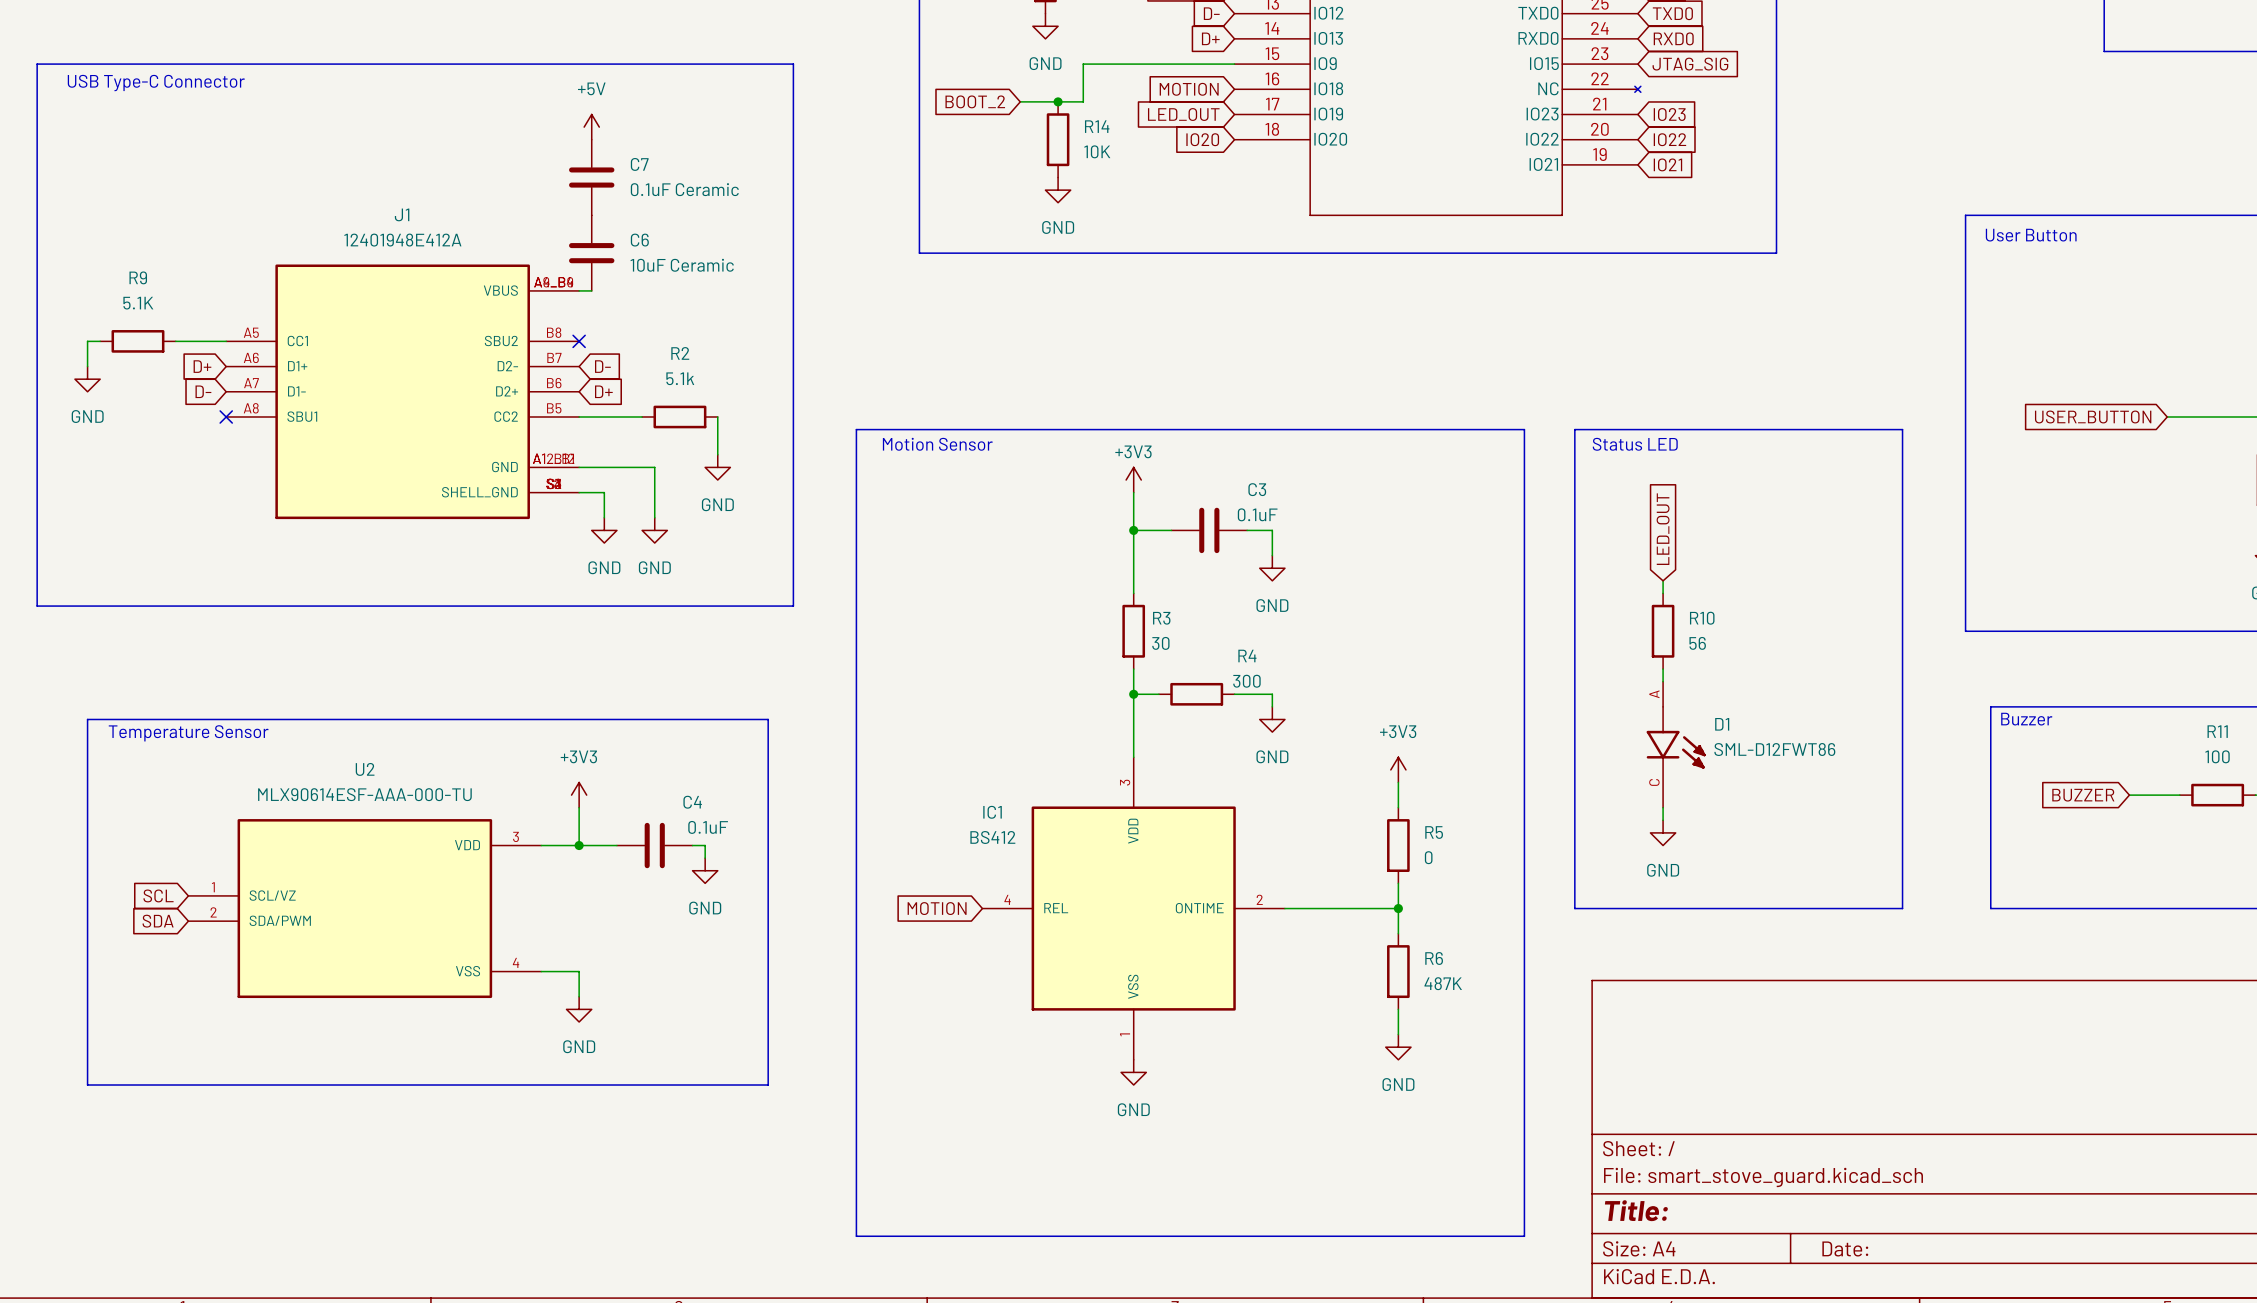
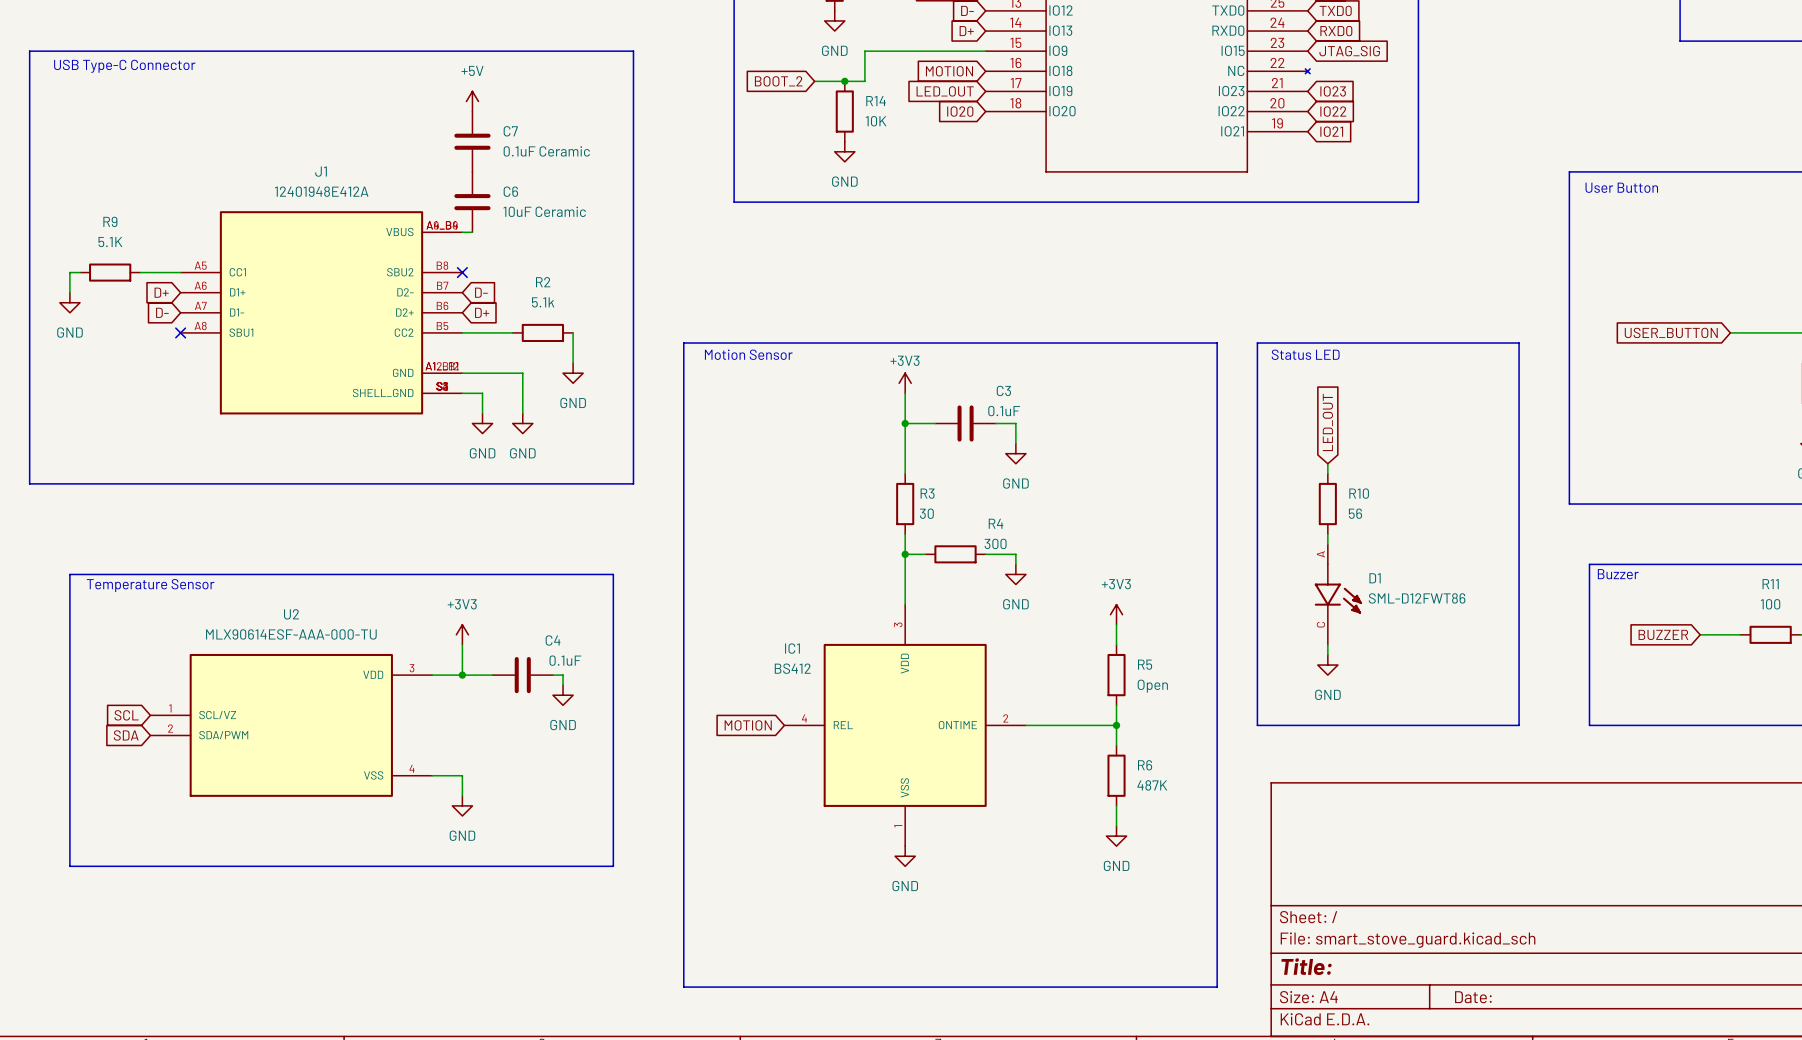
R5 value: 0 (1428, 857) -> Open (1152, 686)

